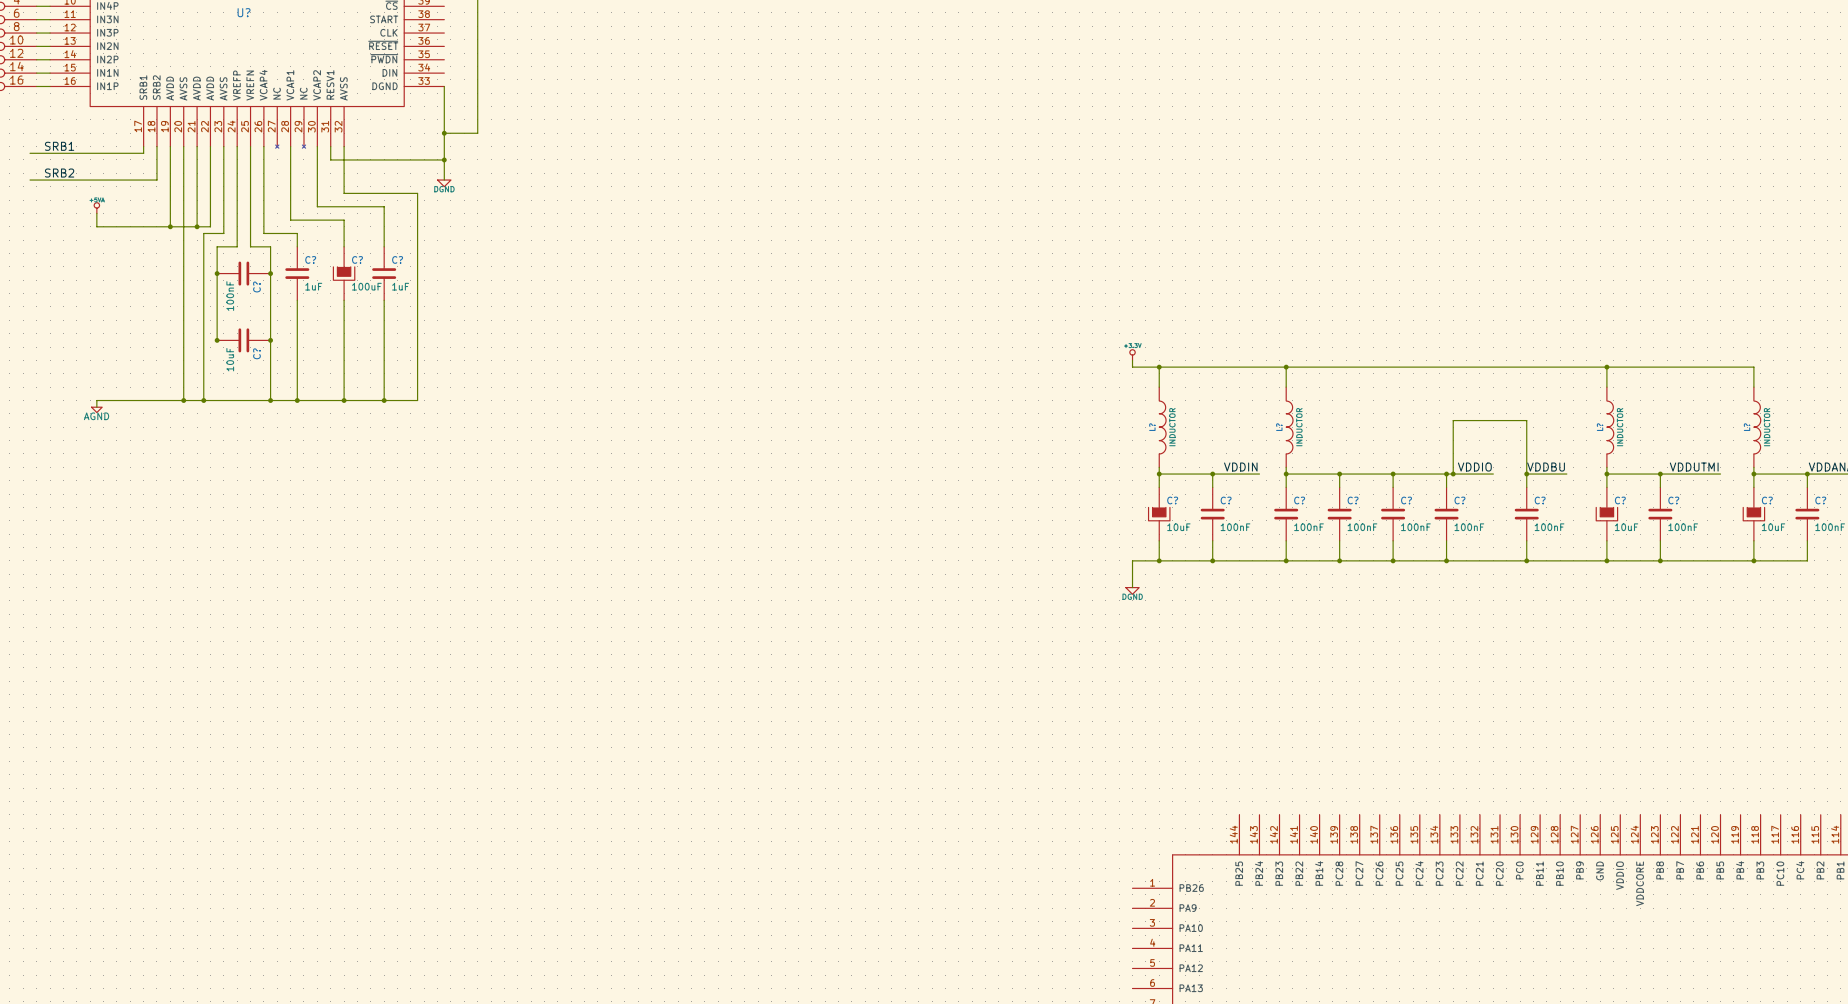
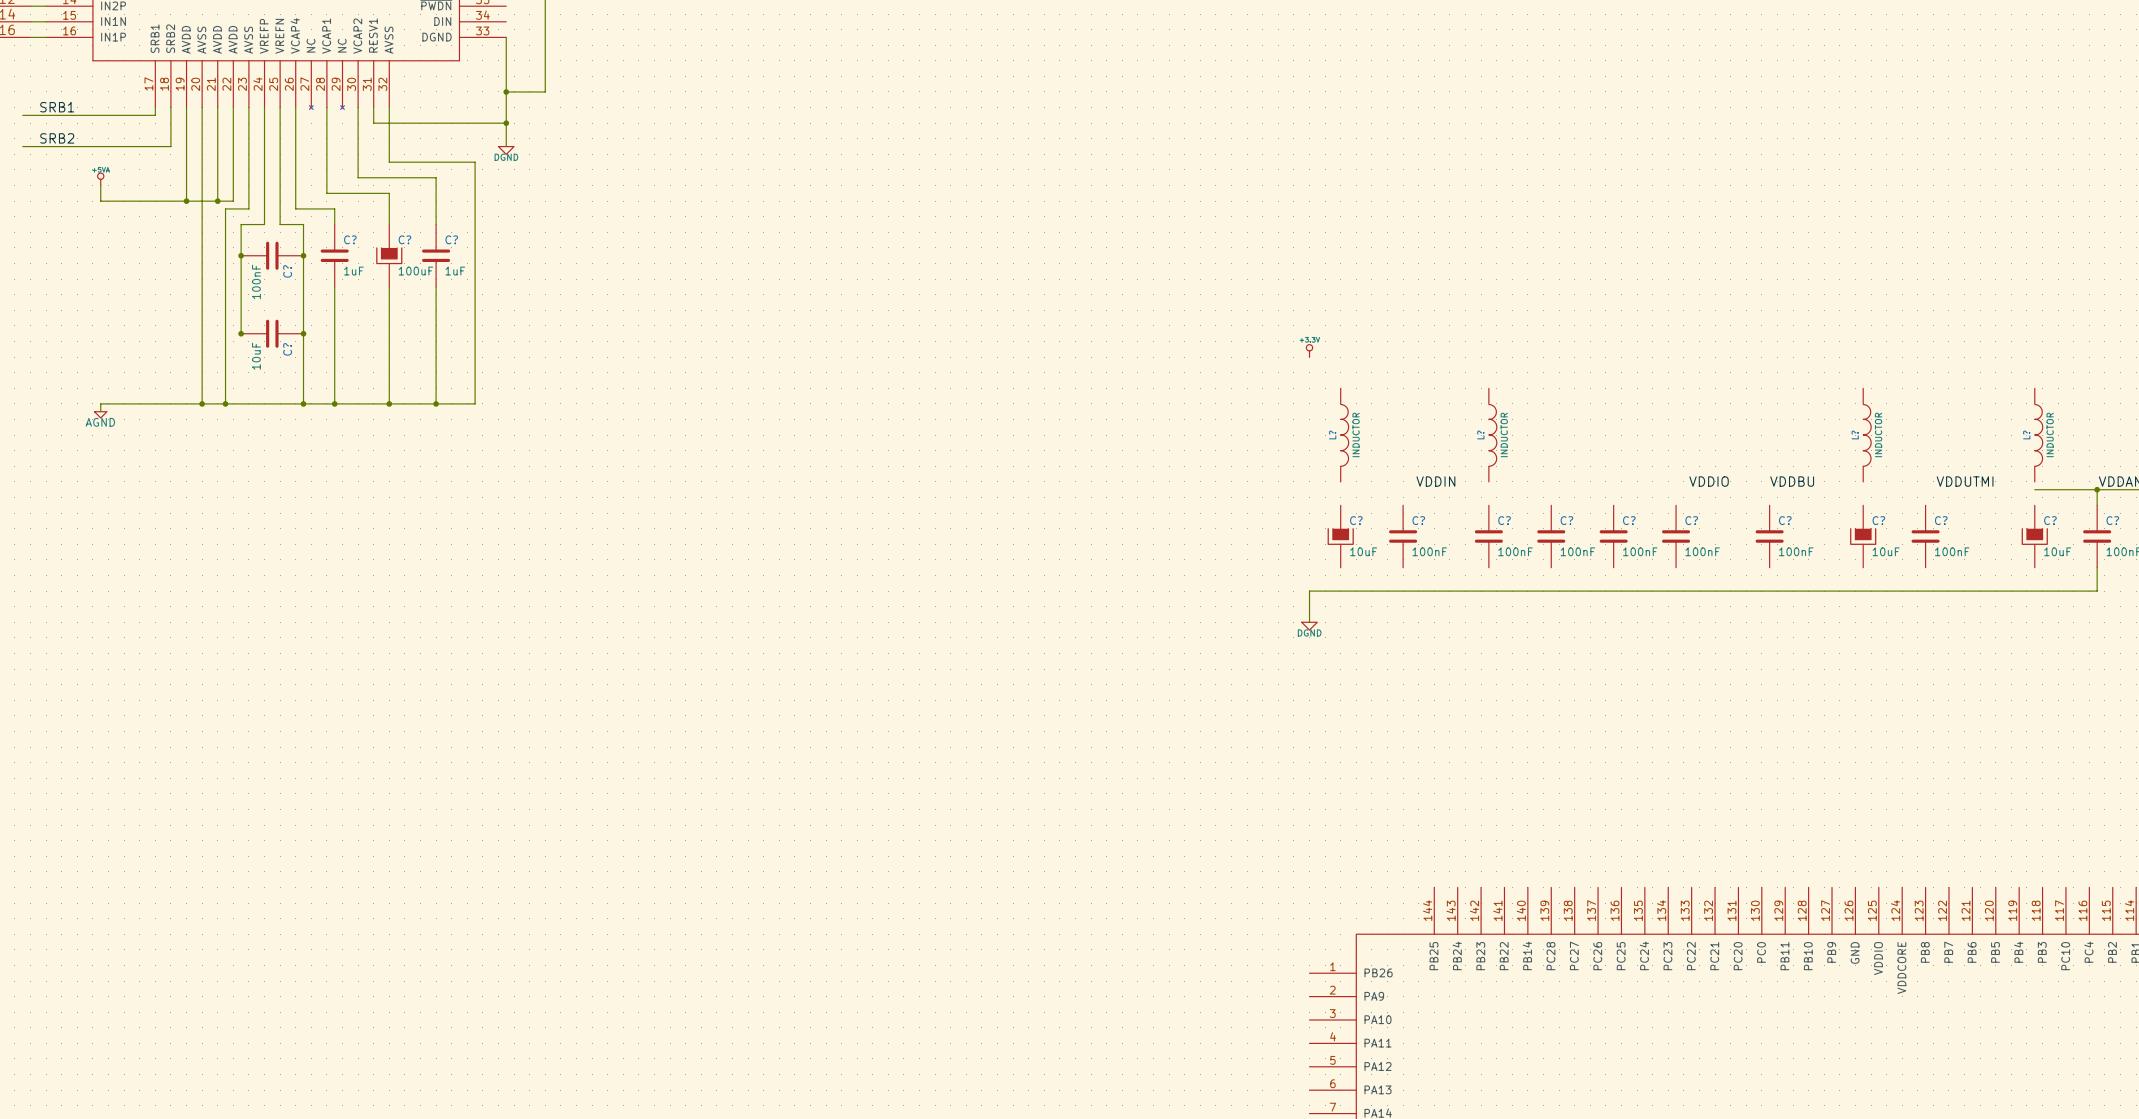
wire: (1132, 360) (1132, 367) (1753, 367) (1753, 387) -> none
wire: (1159, 367) (1159, 387) -> none
junction: (1159, 367) -> none
wire: (1286, 367) (1286, 387) -> none
junction: (1286, 367) -> none
wire: (1606, 367) (1606, 387) -> none
junction: (1606, 367) -> none
wire: (1159, 467) (1159, 487) -> none
wire: (1286, 467) (1286, 487) -> none
wire: (1606, 467) (1606, 487) -> none
wire: (1753, 467) (1753, 487) -> none
wire: (1159, 474) (1259, 474) -> none
junction: (1159, 474) -> none
wire: (1212, 474) (1212, 487) -> none
junction: (1212, 474) -> none
wire: (1286, 474) (1493, 474) -> none
junction: (1286, 474) -> none
wire: (1339, 474) (1339, 487) -> none
junction: (1339, 474) -> none
wire: (1393, 474) (1393, 487) -> none
junction: (1393, 474) -> none
wire: (1446, 474) (1446, 487) -> none
junction: (1446, 474) -> none
wire: (1453, 474) (1453, 420) (1526, 420) (1526, 487) -> none
junction: (1453, 474) -> none
wire: (1526, 474) (1566, 474) -> none
junction: (1526, 474) -> none
wire: (1606, 474) (1720, 474) -> none
junction: (1606, 474) -> none
wire: (1660, 474) (1660, 487) -> none
junction: (1660, 474) -> none
junction: (1753, 474) -> none
wire: (1159, 540) (1159, 560) -> none
wire: (1212, 540) (1212, 560) -> none
wire: (1286, 540) (1286, 560) -> none
wire: (1339, 540) (1339, 560) -> none
wire: (1393, 540) (1393, 560) -> none
wire: (1446, 540) (1446, 560) -> none
wire: (1526, 540) (1526, 560) -> none
wire: (1606, 540) (1606, 560) -> none
wire: (1660, 540) (1660, 560) -> none
wire: (1753, 540) (1753, 560) -> none
junction: (1159, 560) -> none
junction: (1212, 560) -> none
junction: (1286, 560) -> none
junction: (1339, 560) -> none
junction: (1393, 560) -> none
junction: (1446, 560) -> none
junction: (1526, 560) -> none
junction: (1606, 560) -> none
junction: (1660, 560) -> none
junction: (1753, 560) -> none

